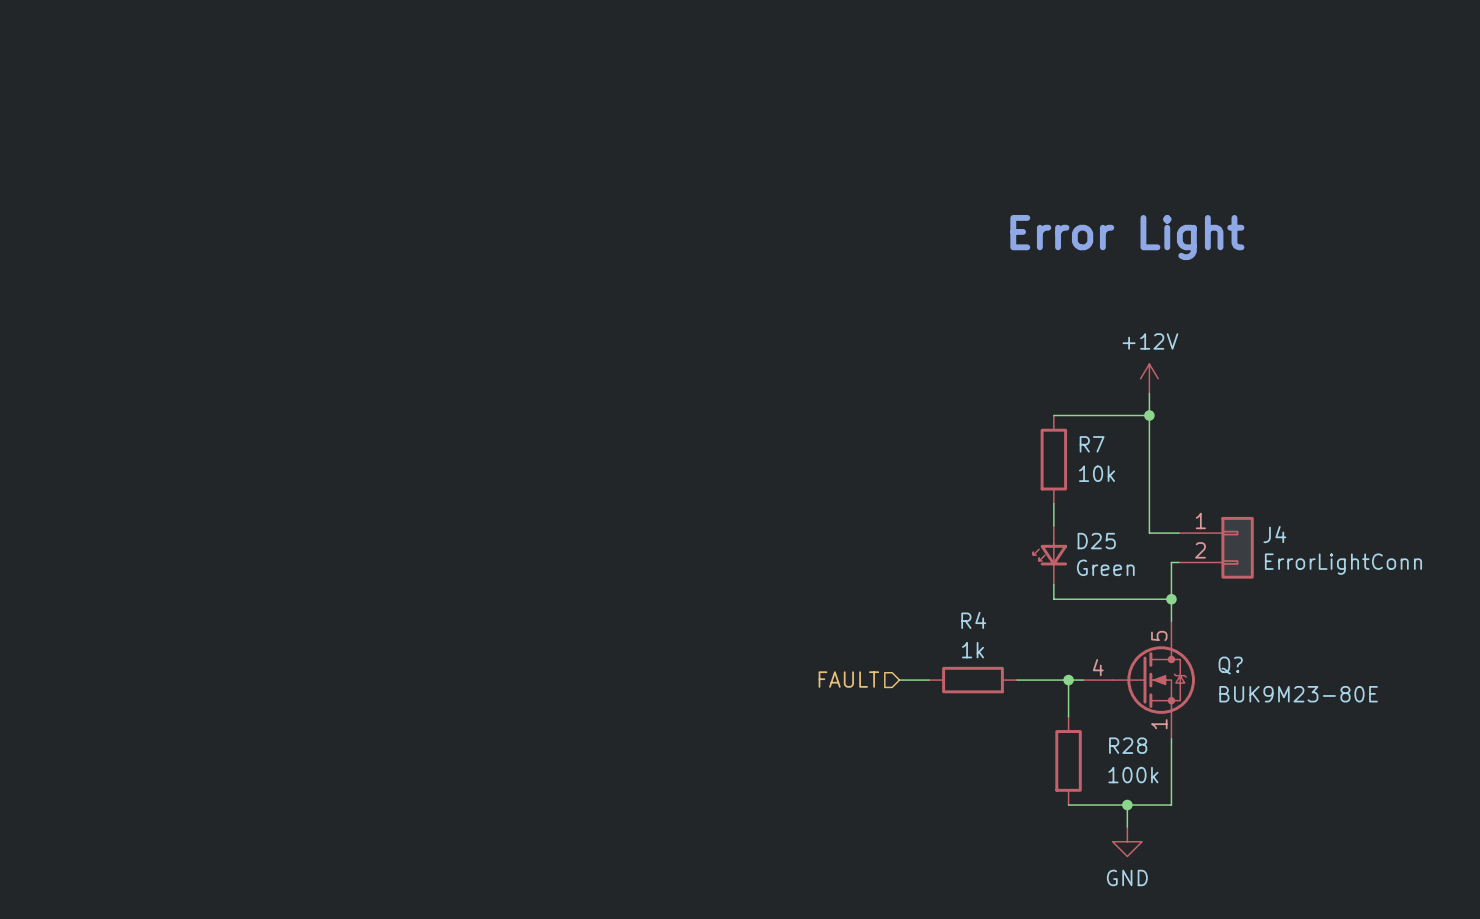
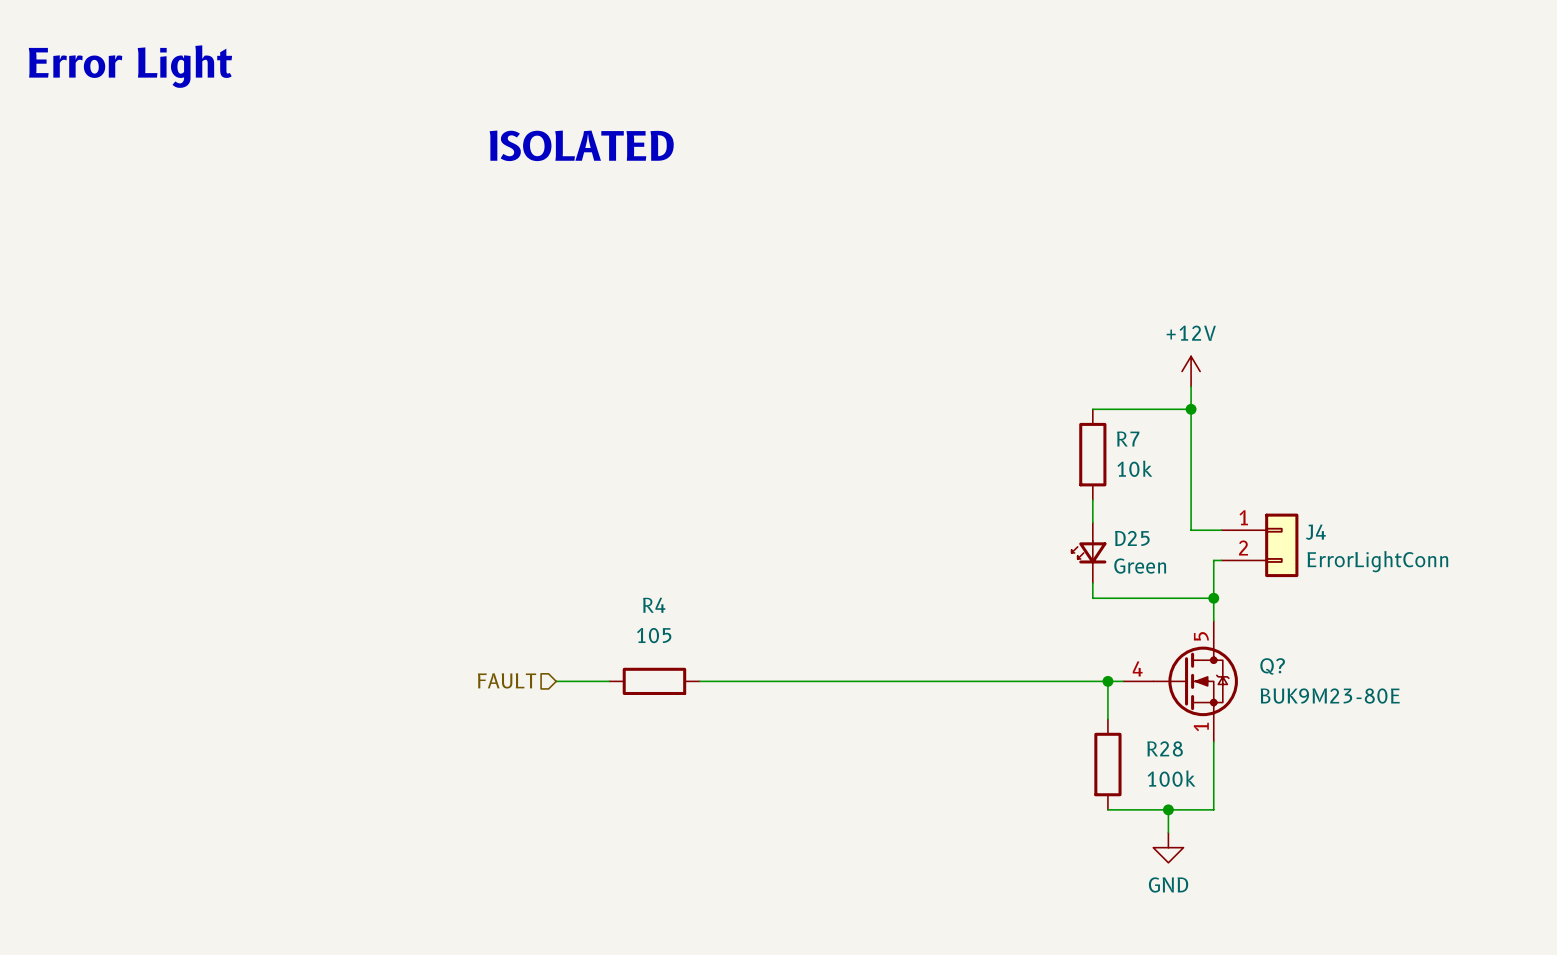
text: none -> Error Light (130, 66)
text: none -> ISOLATED (581, 145)
text: Error Light (1127, 237) -> none
R4 name position: R4 (973, 620) -> R4 (654, 605)
R4 value: 1k (973, 650) -> 105 (654, 635)
hierarchical label: none -> FAULT (507, 680)
hierarchical label: FAULT (848, 679) -> none
wire: none -> (556, 681) (609, 681)
wire: none -> (699, 681) (934, 681)
wire: none -> (964, 681) (1055, 681)
R4 position: (973, 680) -> (654, 681)

